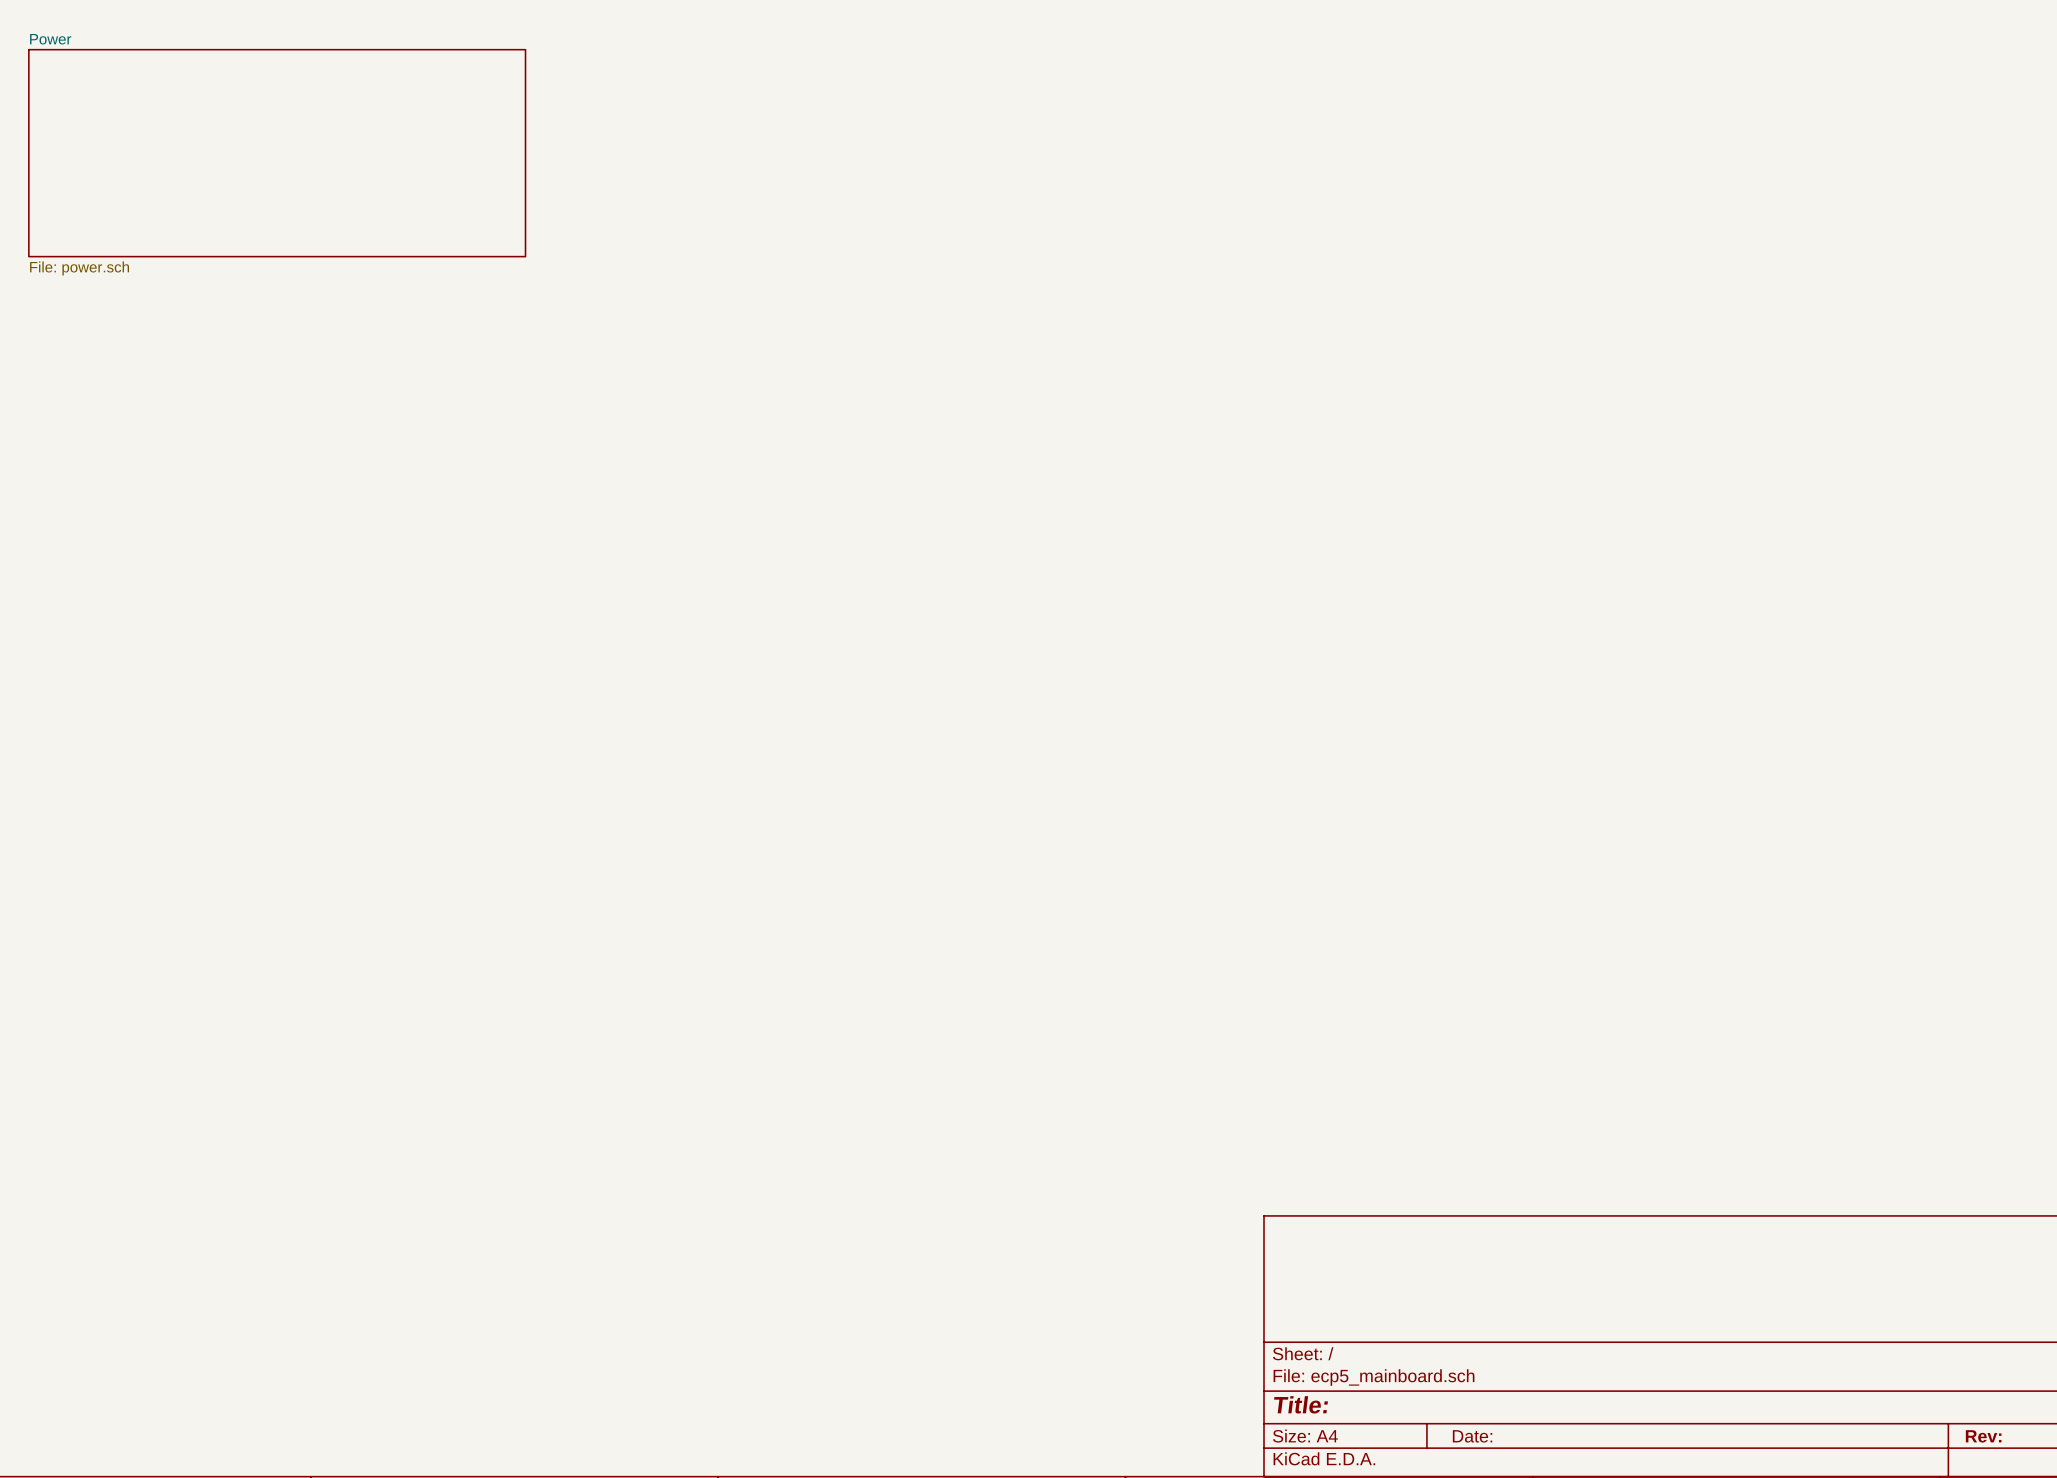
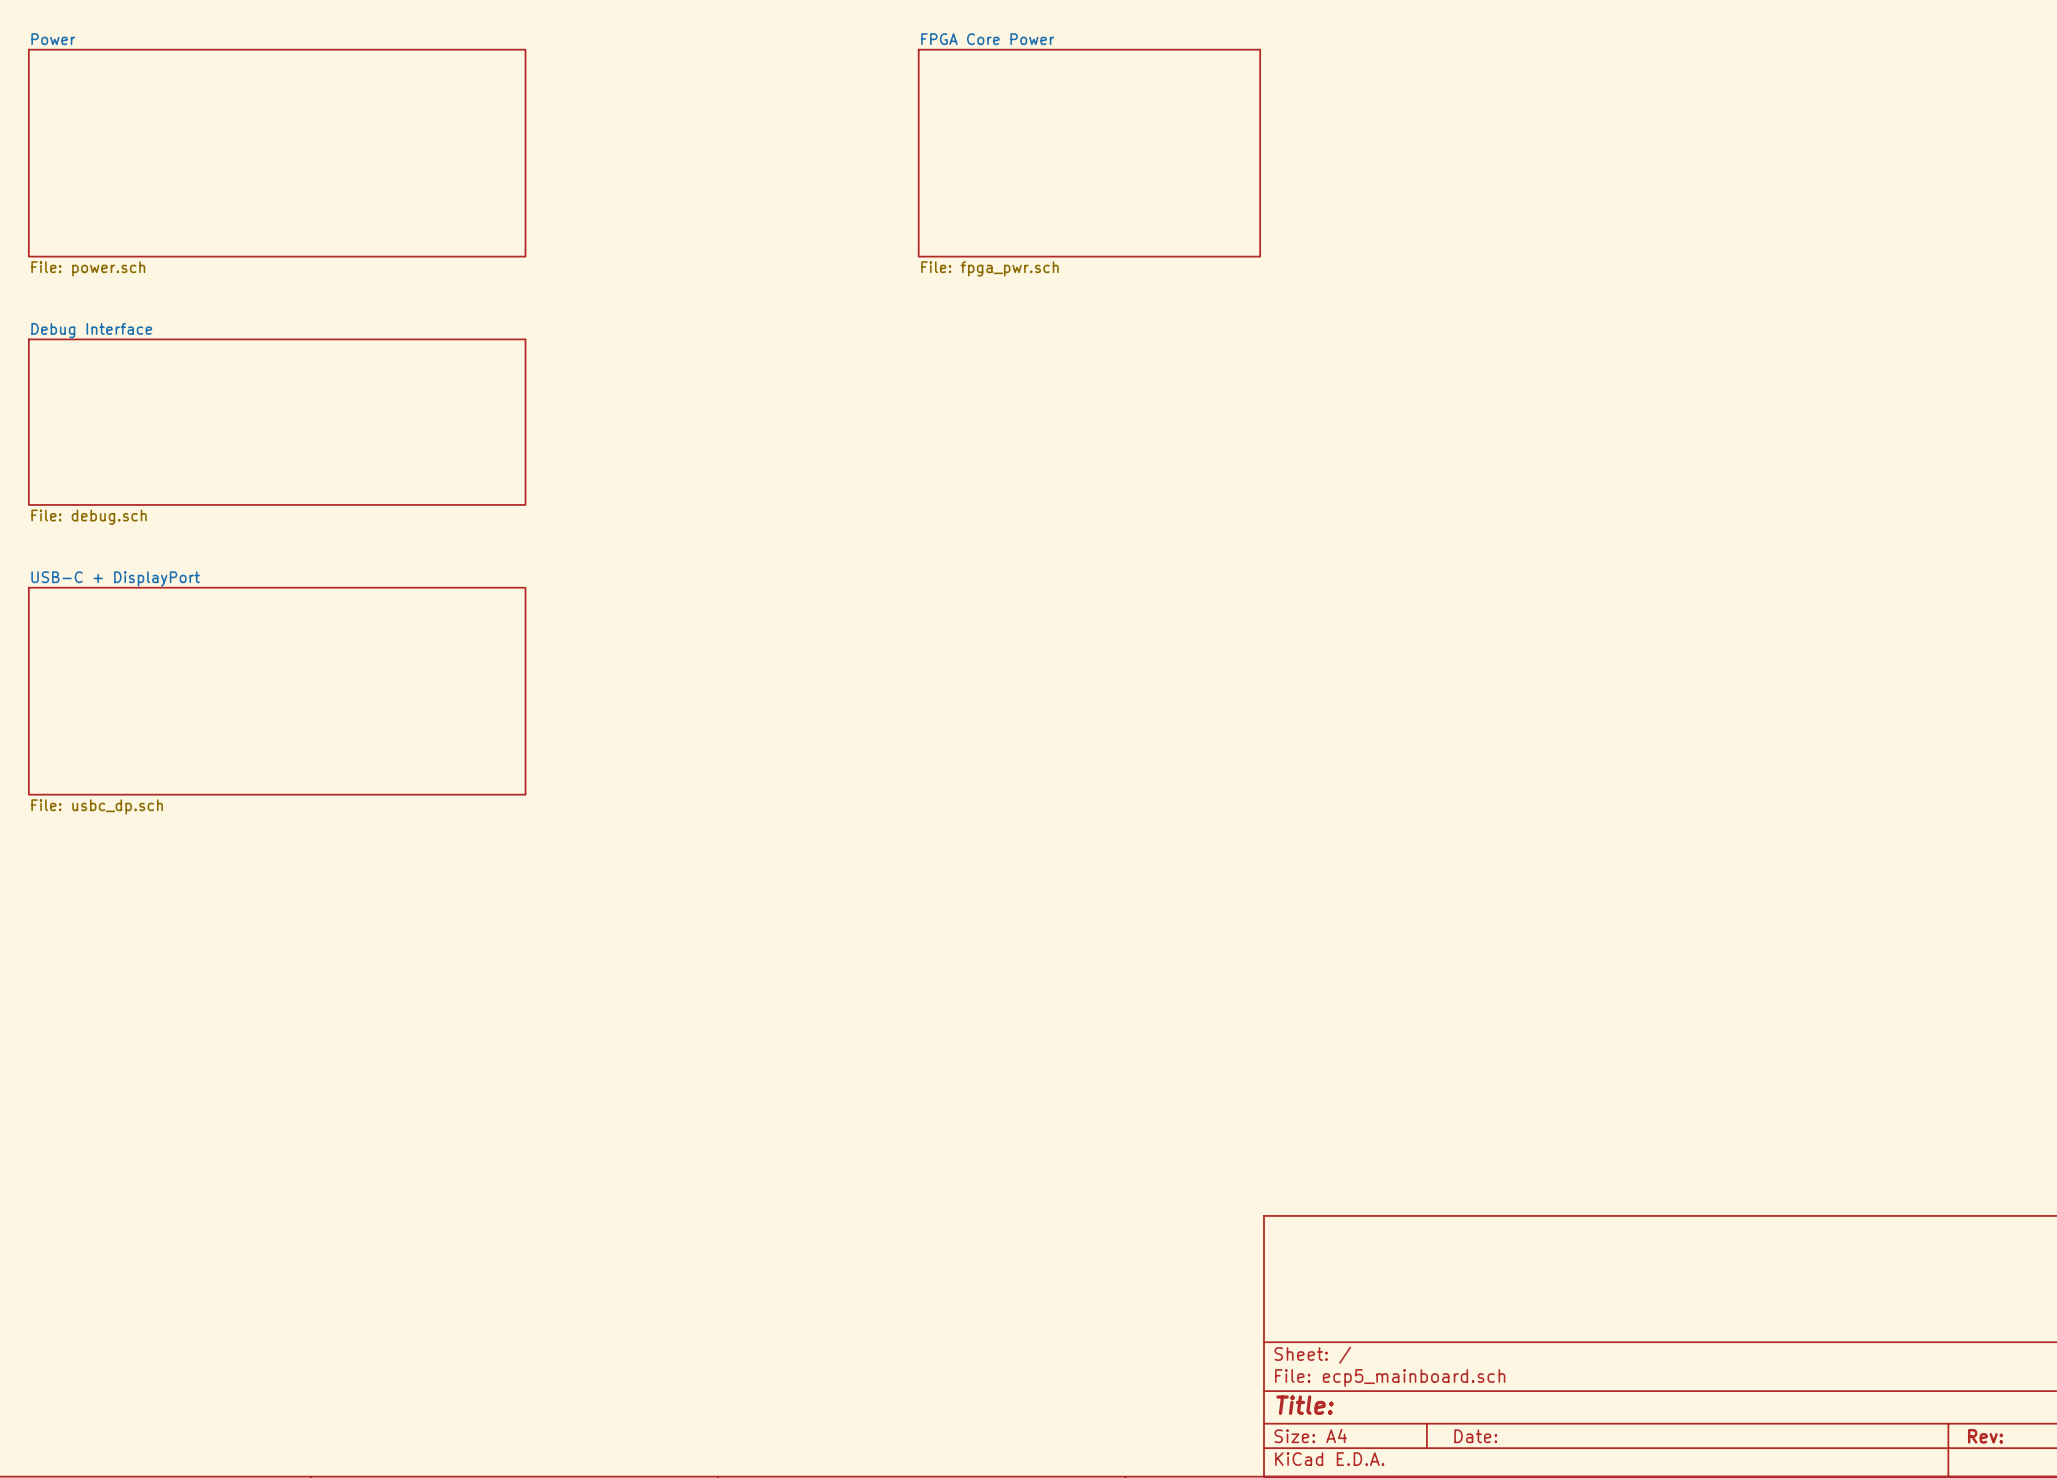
sheet FPGA Core Power: none -> File: fpga_pwr.sch (1089, 153)
sheet Debug Interface: none -> File: debug.sch (277, 422)
sheet USB-C + DisplayPort: none -> File: usbc_dp.sch (277, 691)

